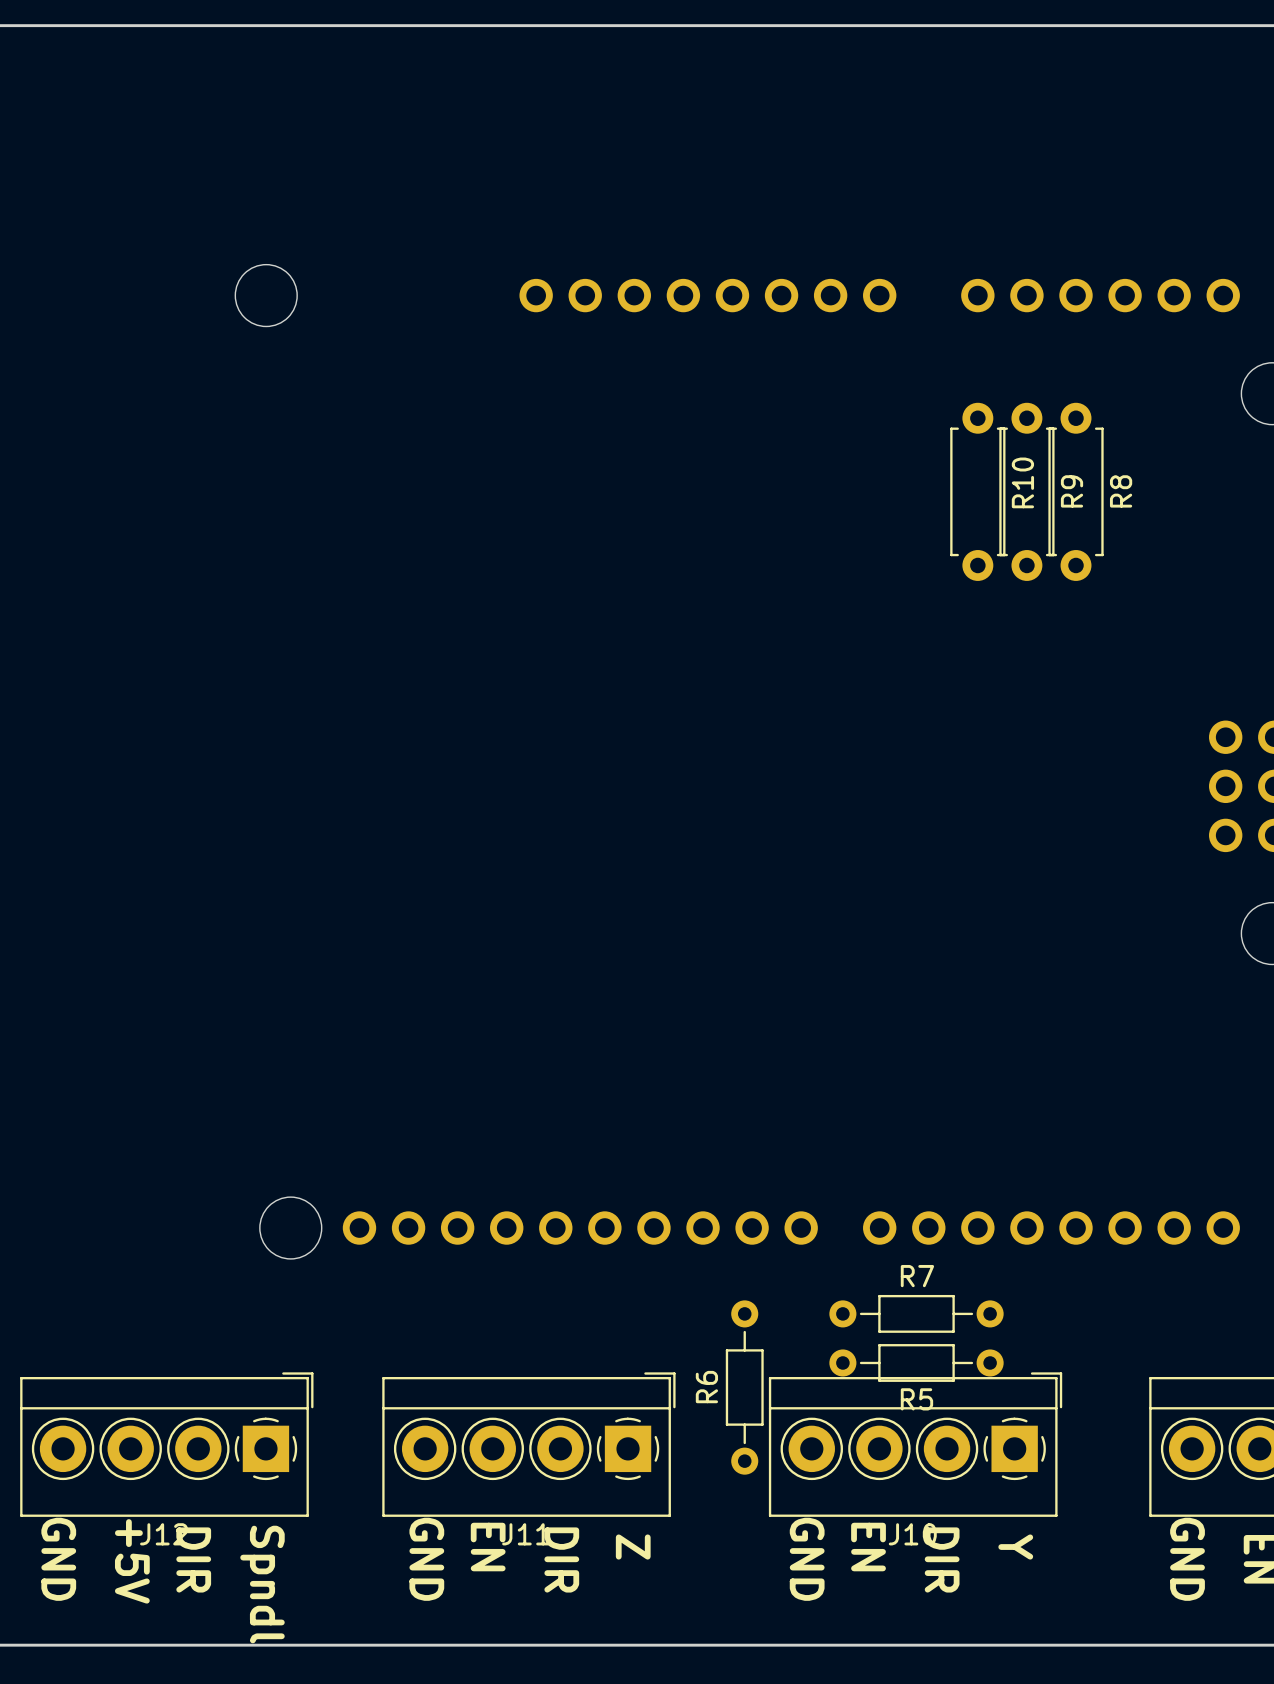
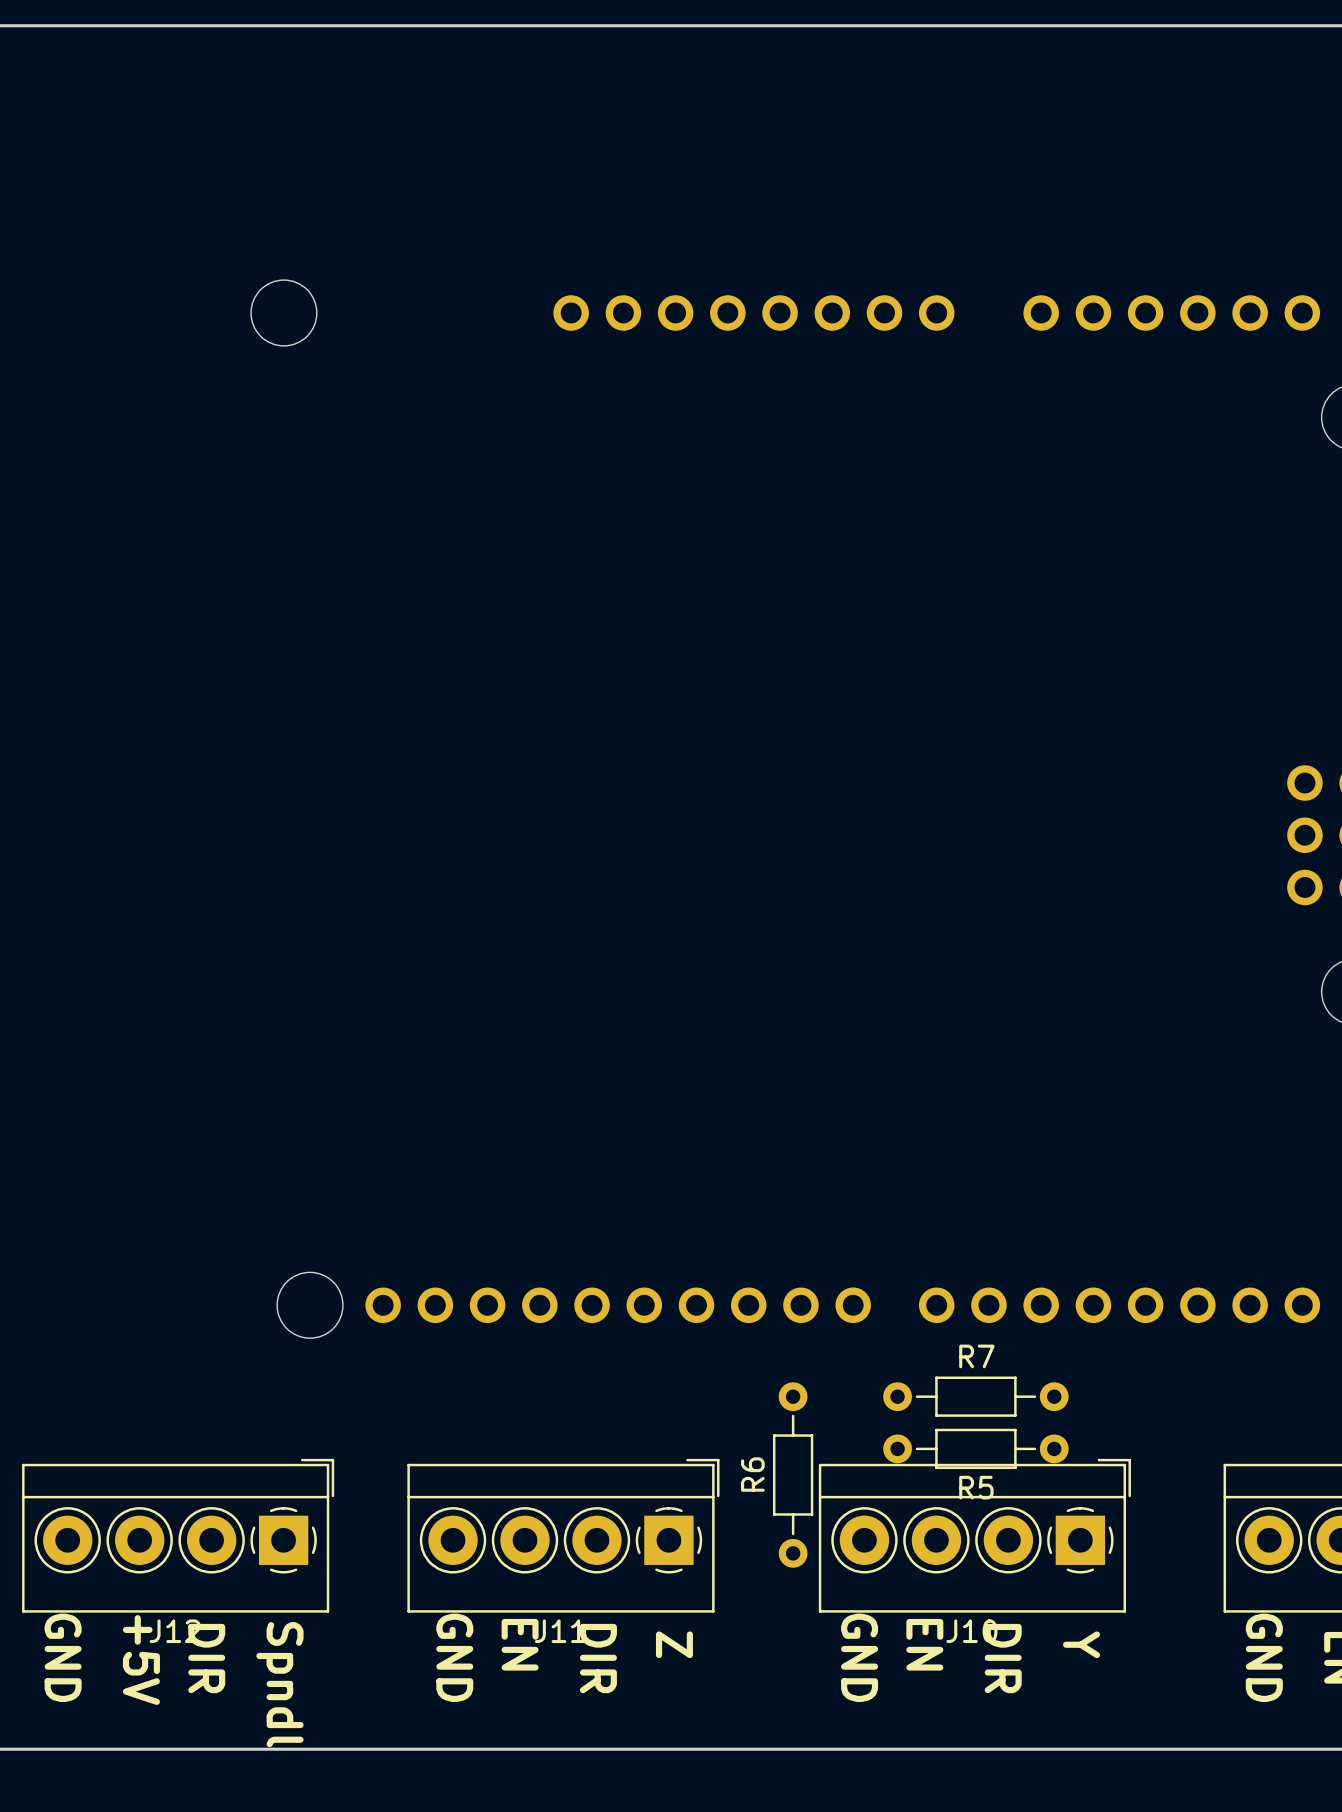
R10: (977, 491) -> none
R9: (1026, 491) -> none
R8: (1076, 491) -> none

